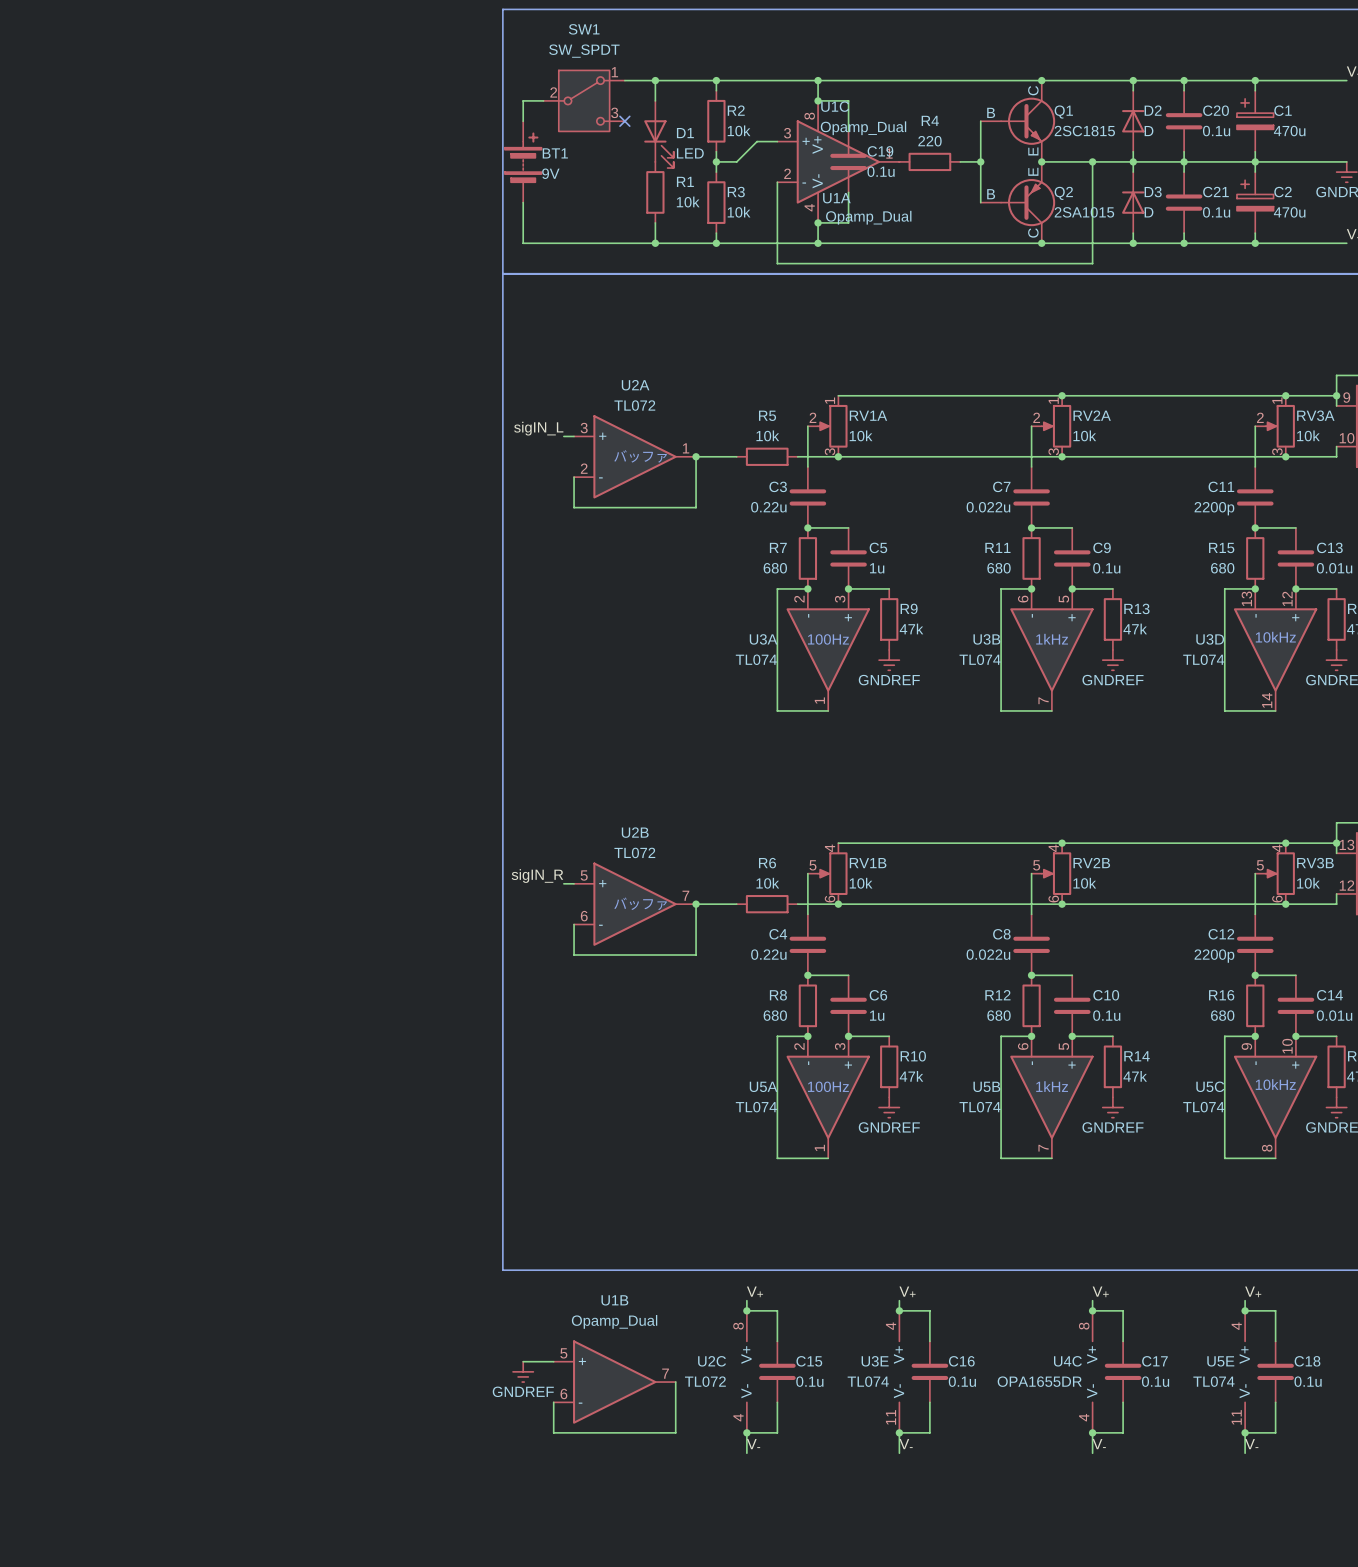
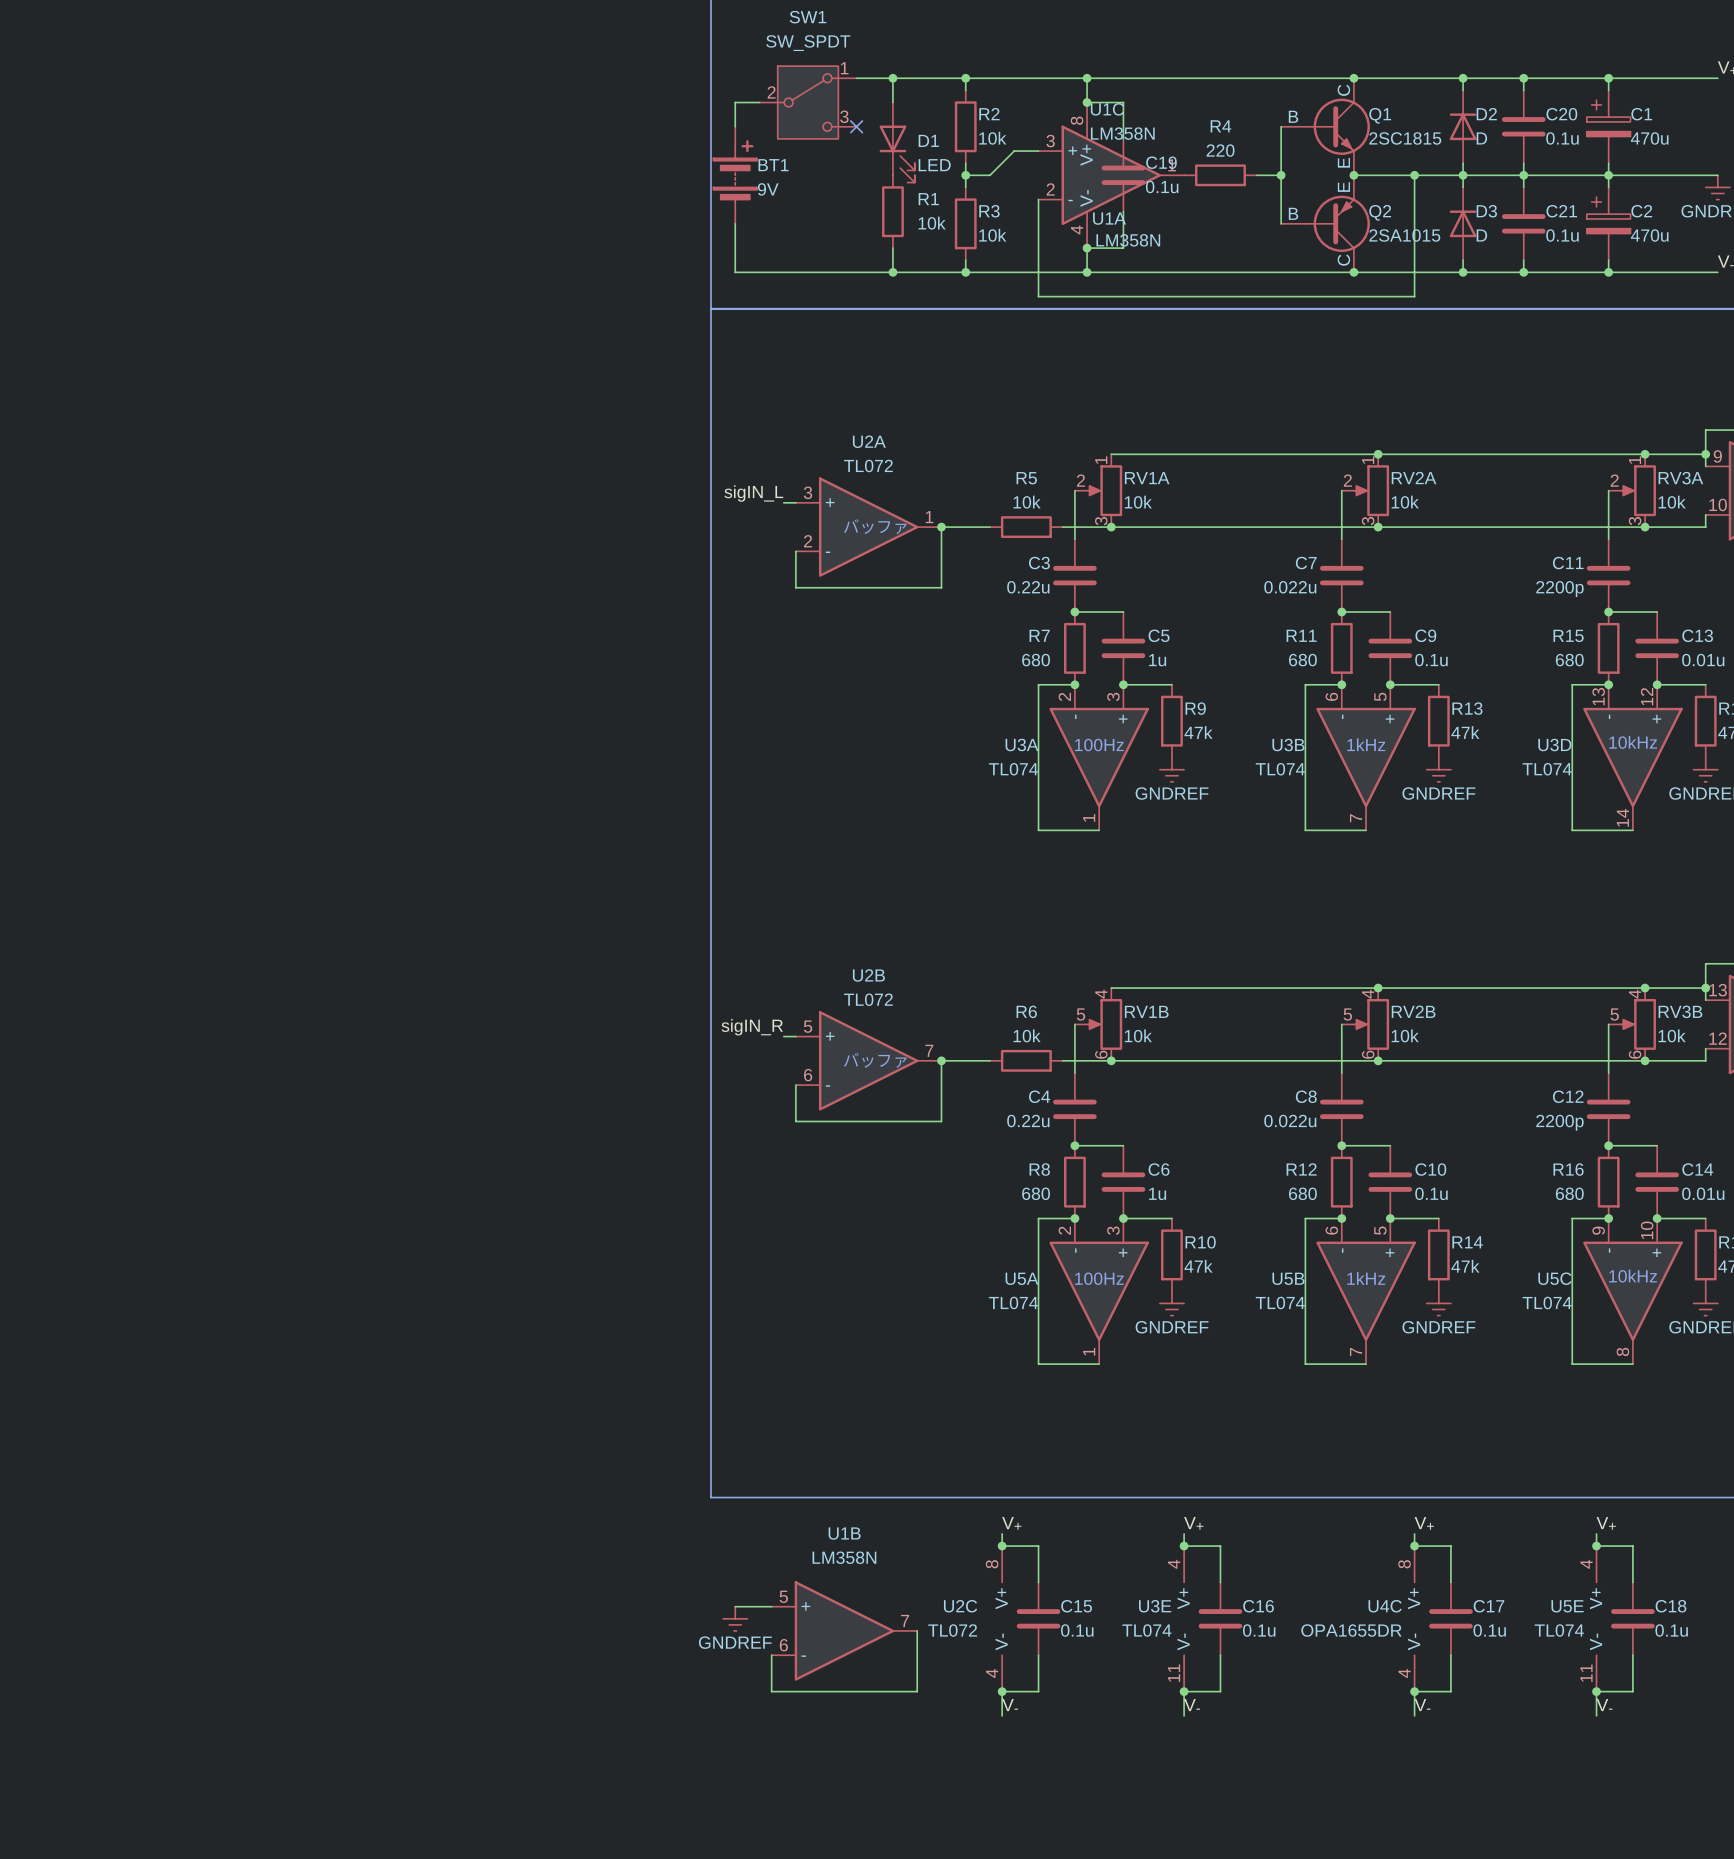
U1C value: Opamp_Dual (863, 128) -> LM358N (1122, 133)
U1A value: Opamp_Dual (868, 217) -> LM358N (1128, 240)
U1B value: Opamp_Dual (614, 1321) -> LM358N (844, 1557)

